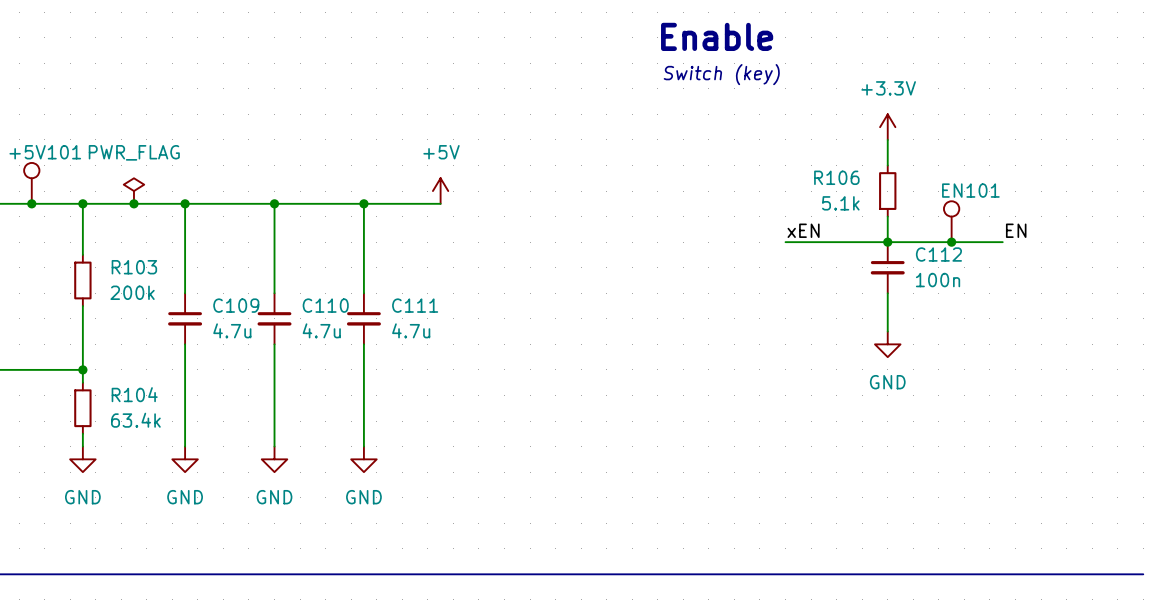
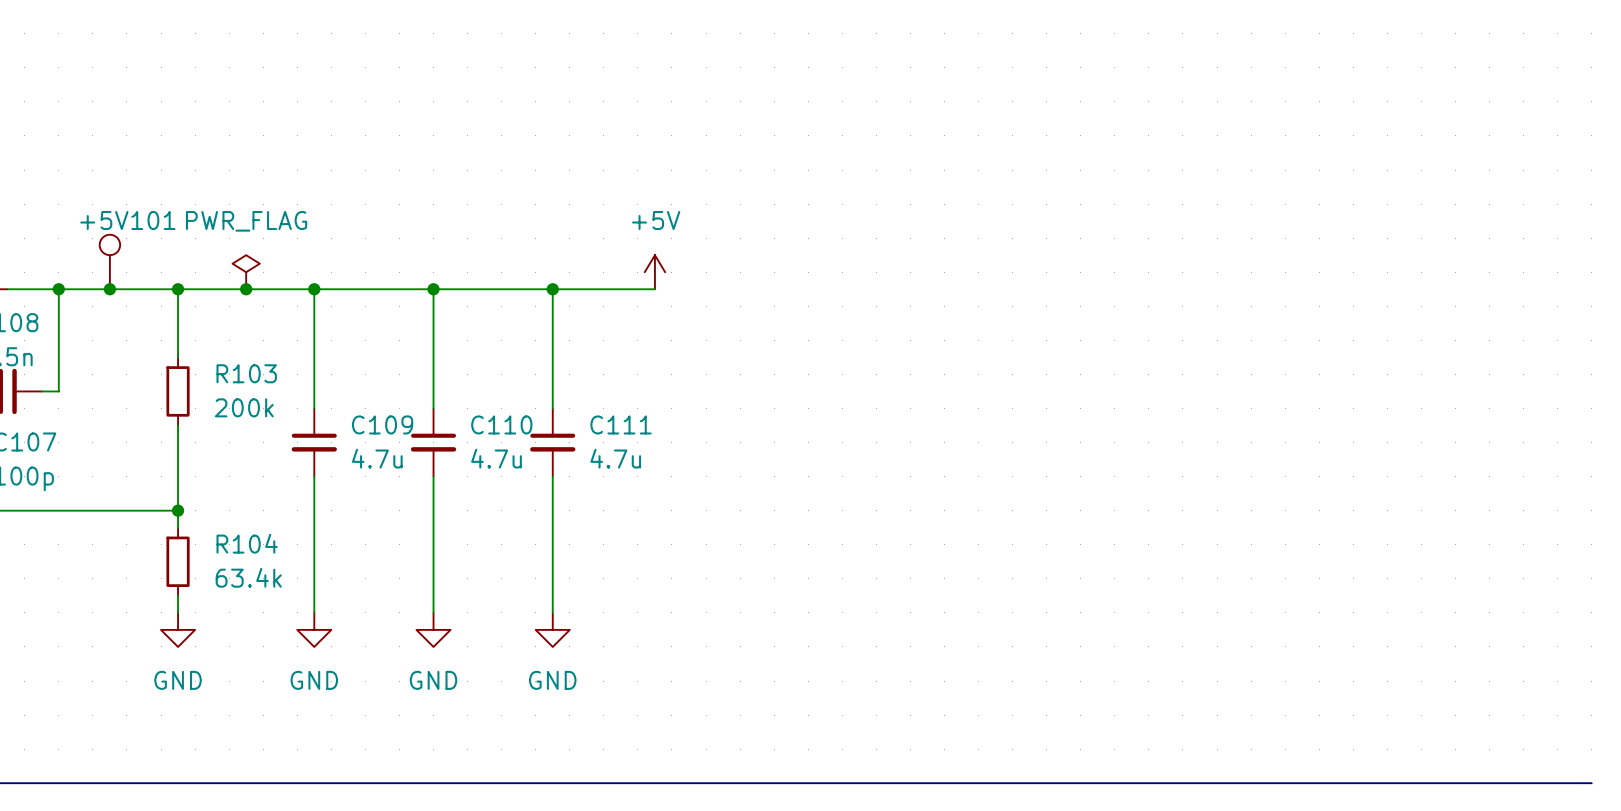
text: Enable (717, 36) -> none
text: Switch (key) (721, 74) -> none
power symbol: +3.3V (887, 127) -> none
wire: (887, 139) (887, 165) -> none
R106: 5.1k (887, 191) -> none
wire: (887, 216) (887, 242) -> none
EN101: (951, 221) -> none
label: xEN (803, 230) -> none
label: EN (1016, 230) -> none
wire: (785, 242) (1002, 242) -> none
junction: (887, 242) -> none
junction: (951, 242) -> none
C112: 100n (887, 267) -> none
wire: (887, 293) (887, 331) -> none
power symbol: GND (887, 344) -> none

